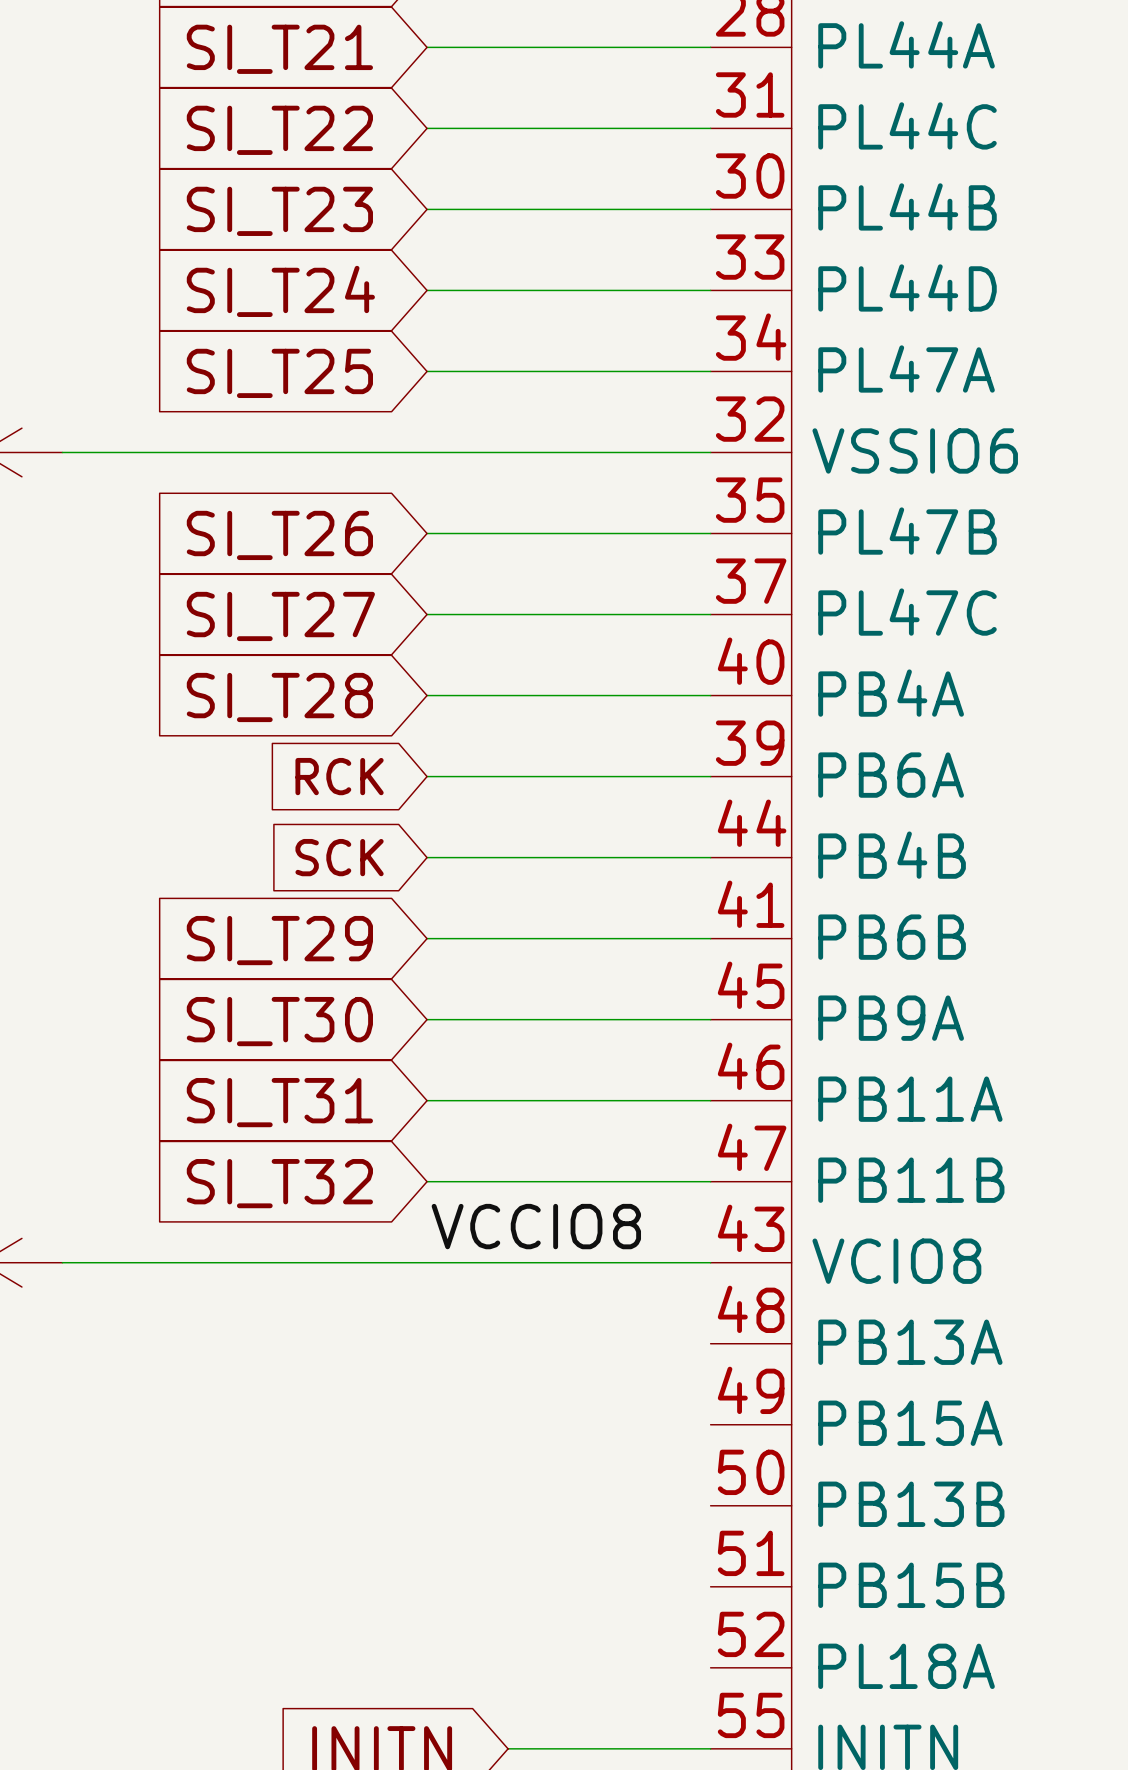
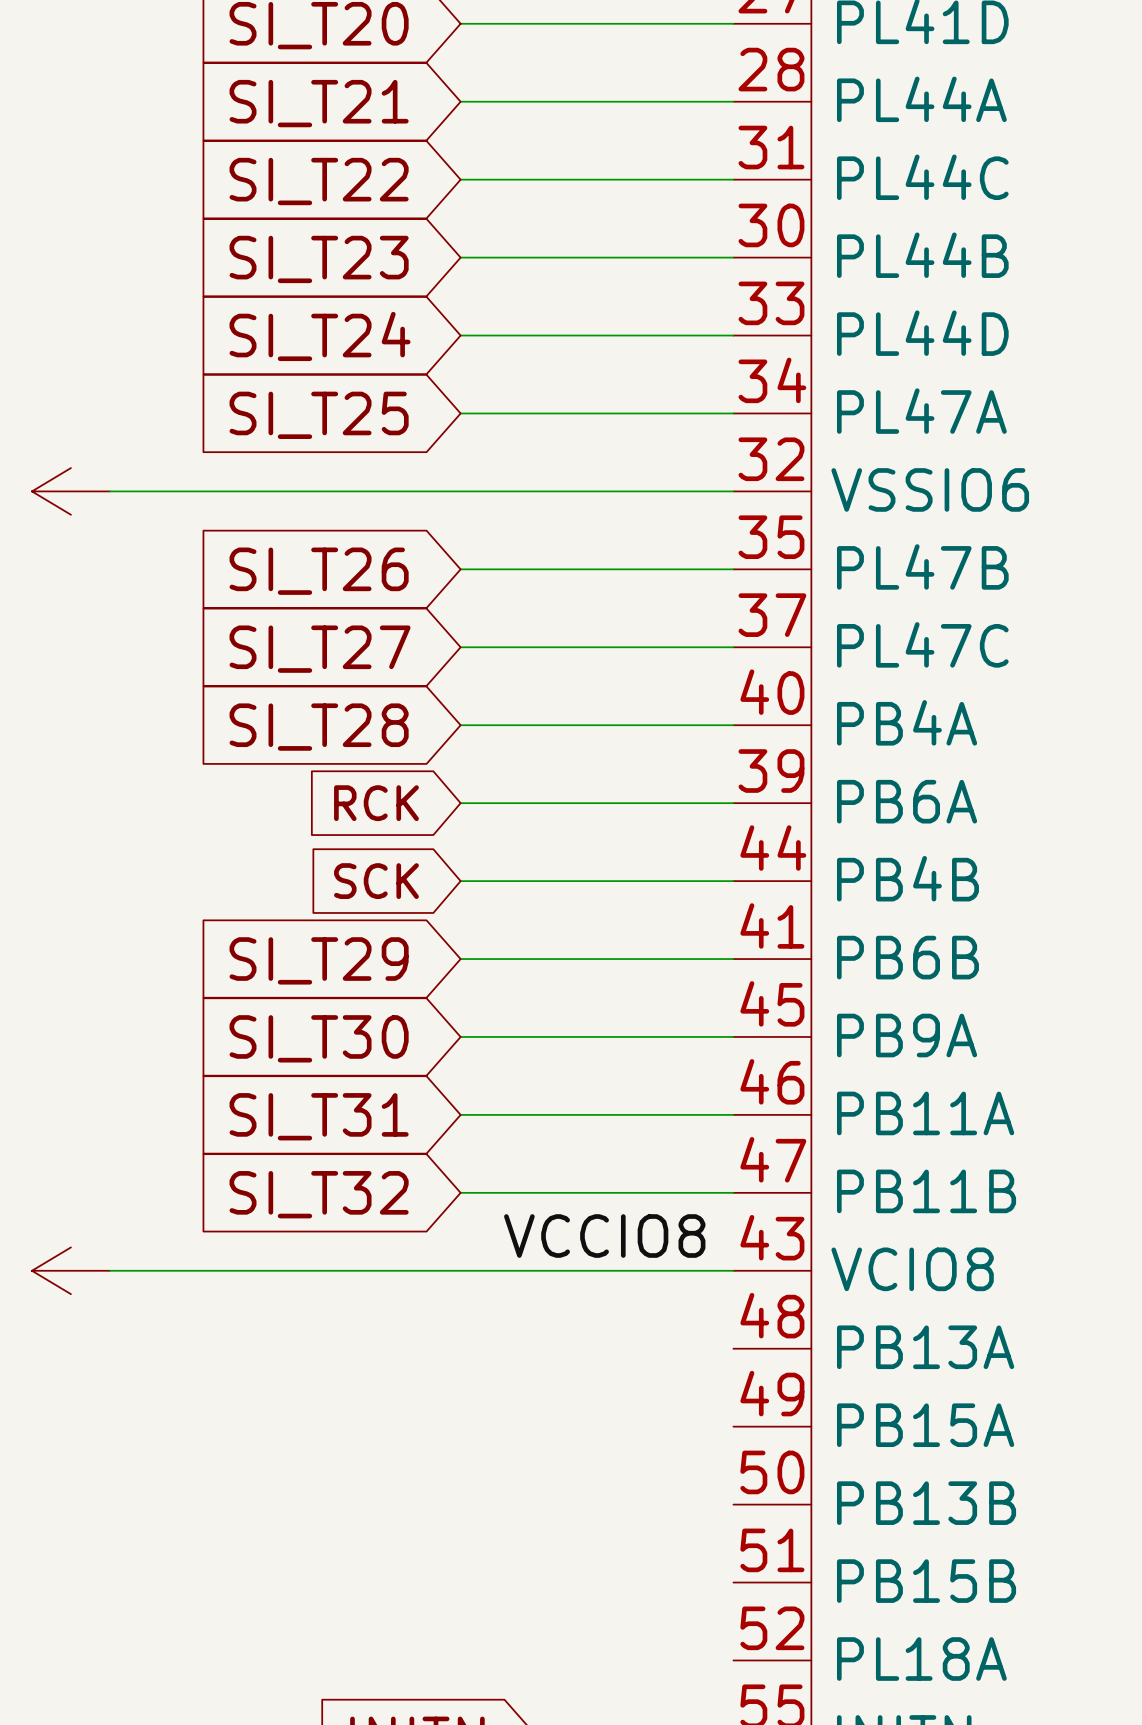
label position: VCCIO8 (536, 1226) -> VCCIO8 (604, 1236)

